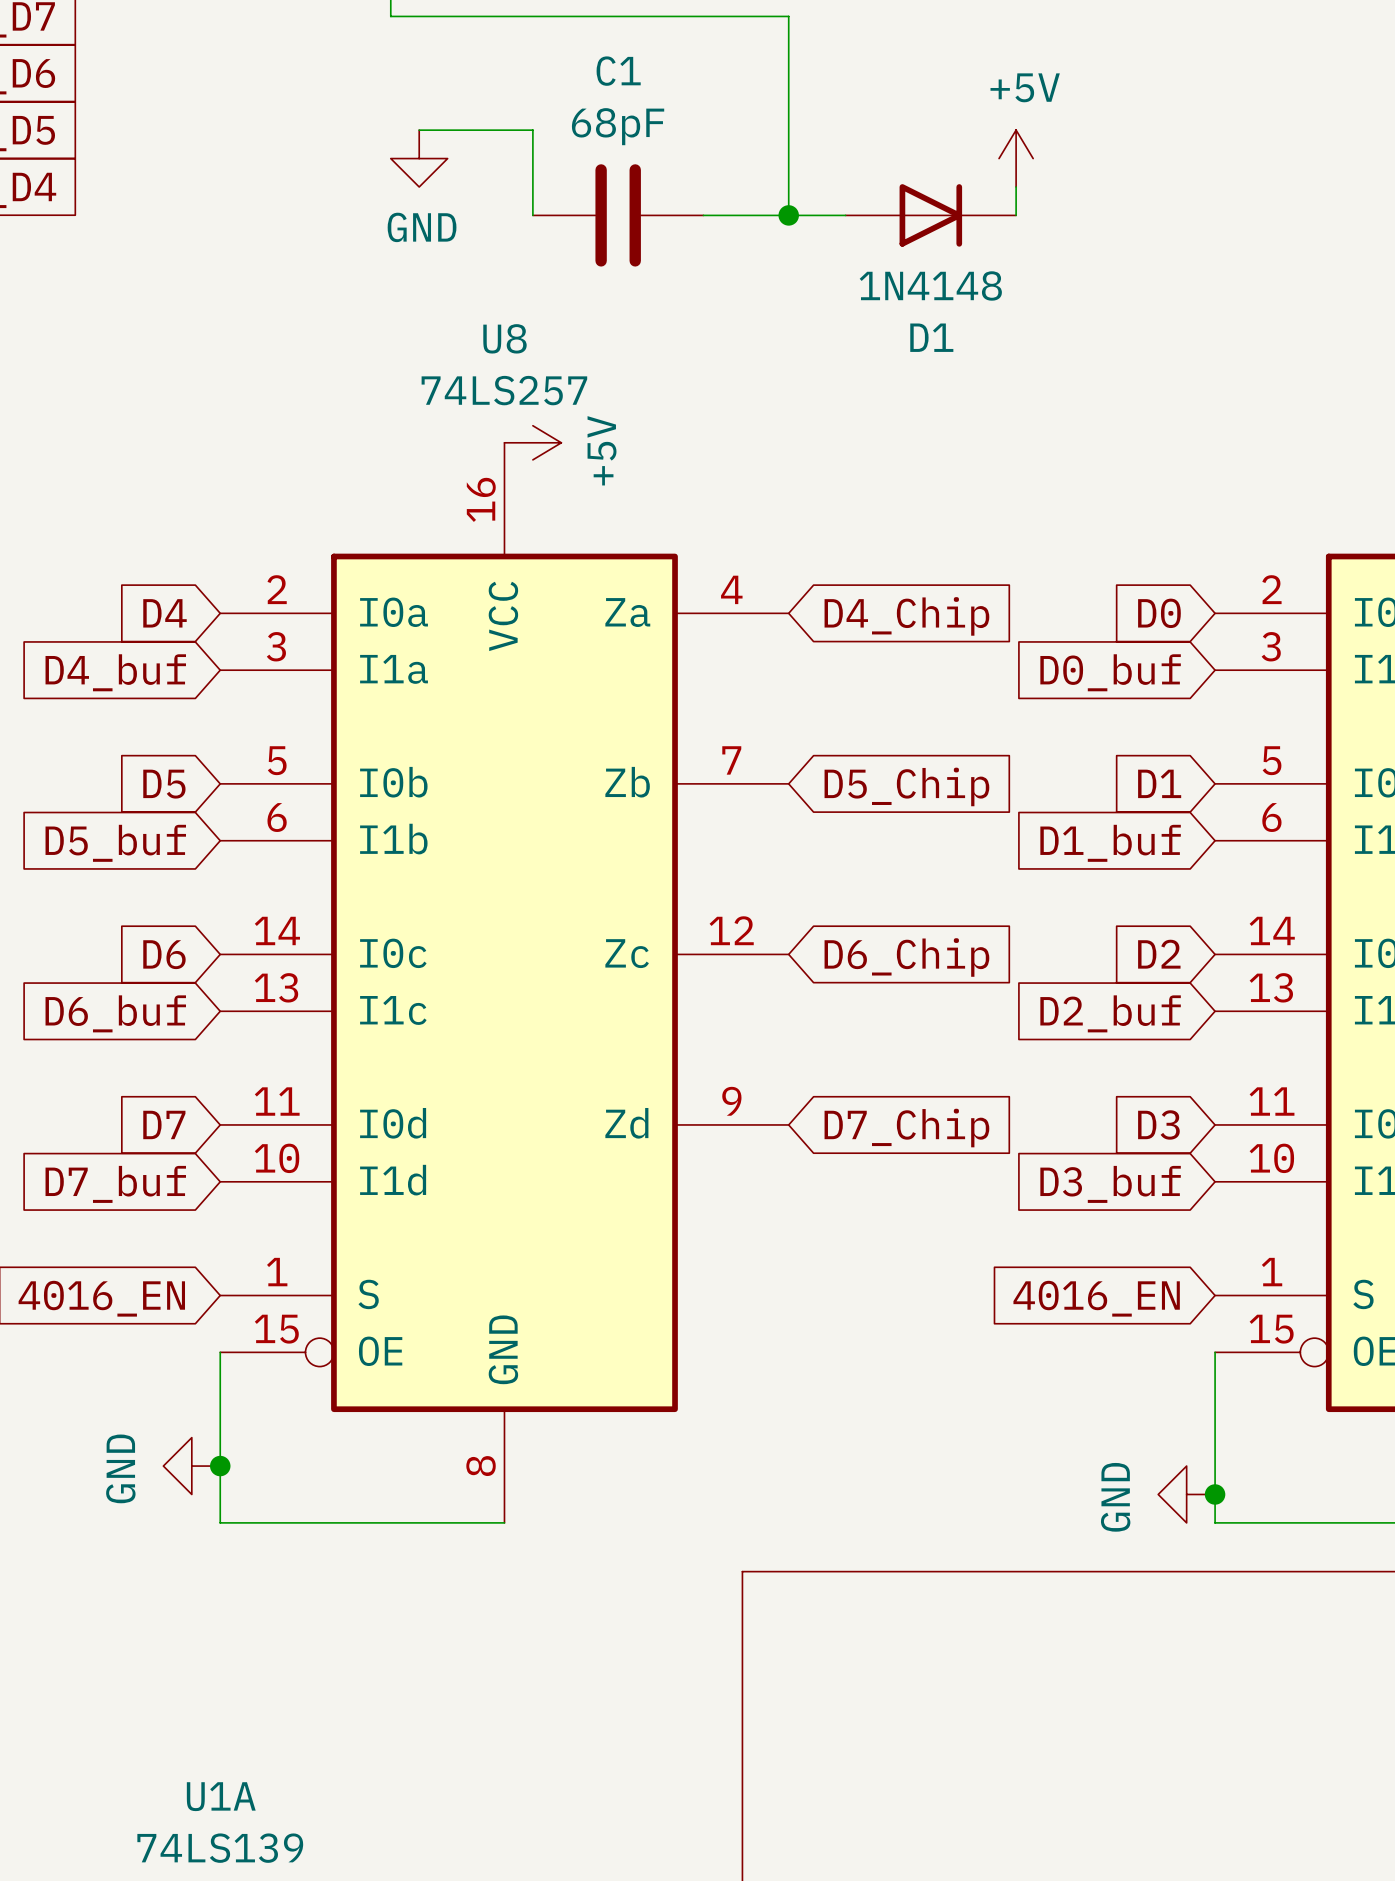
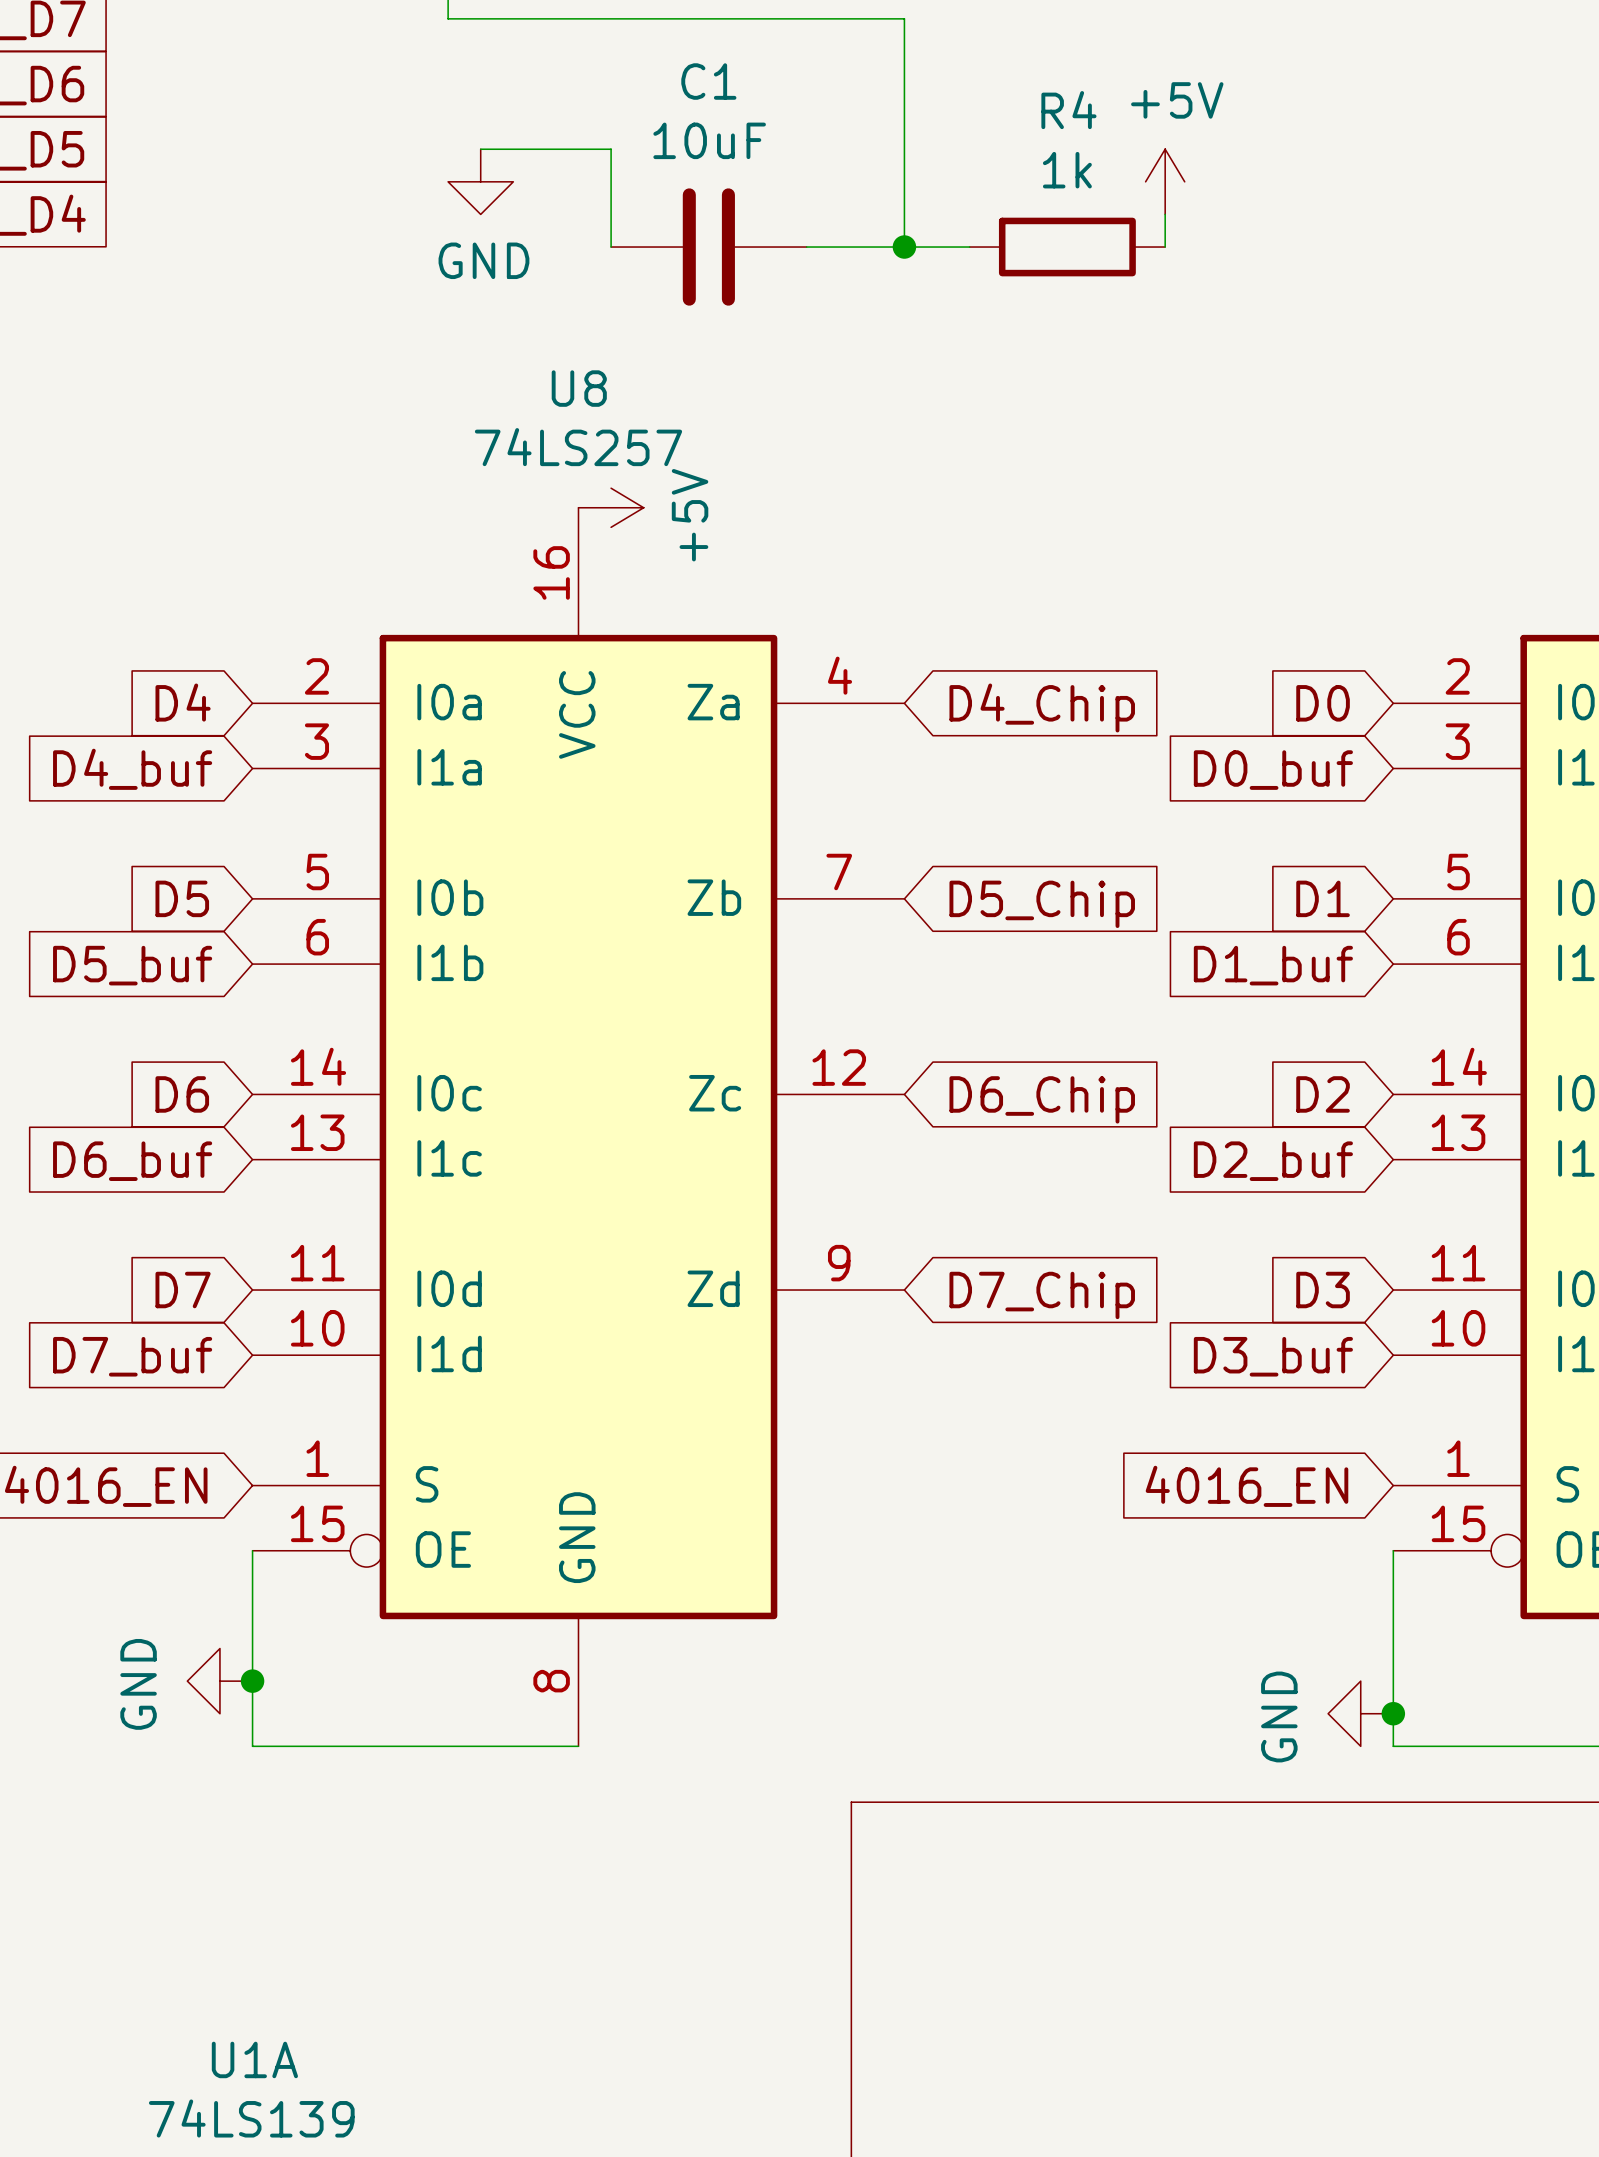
C1 value: 68pF (618, 126) -> 10uF (709, 140)
D1: 1N4148 (930, 215) -> none
R4: none -> 1k (1067, 247)

